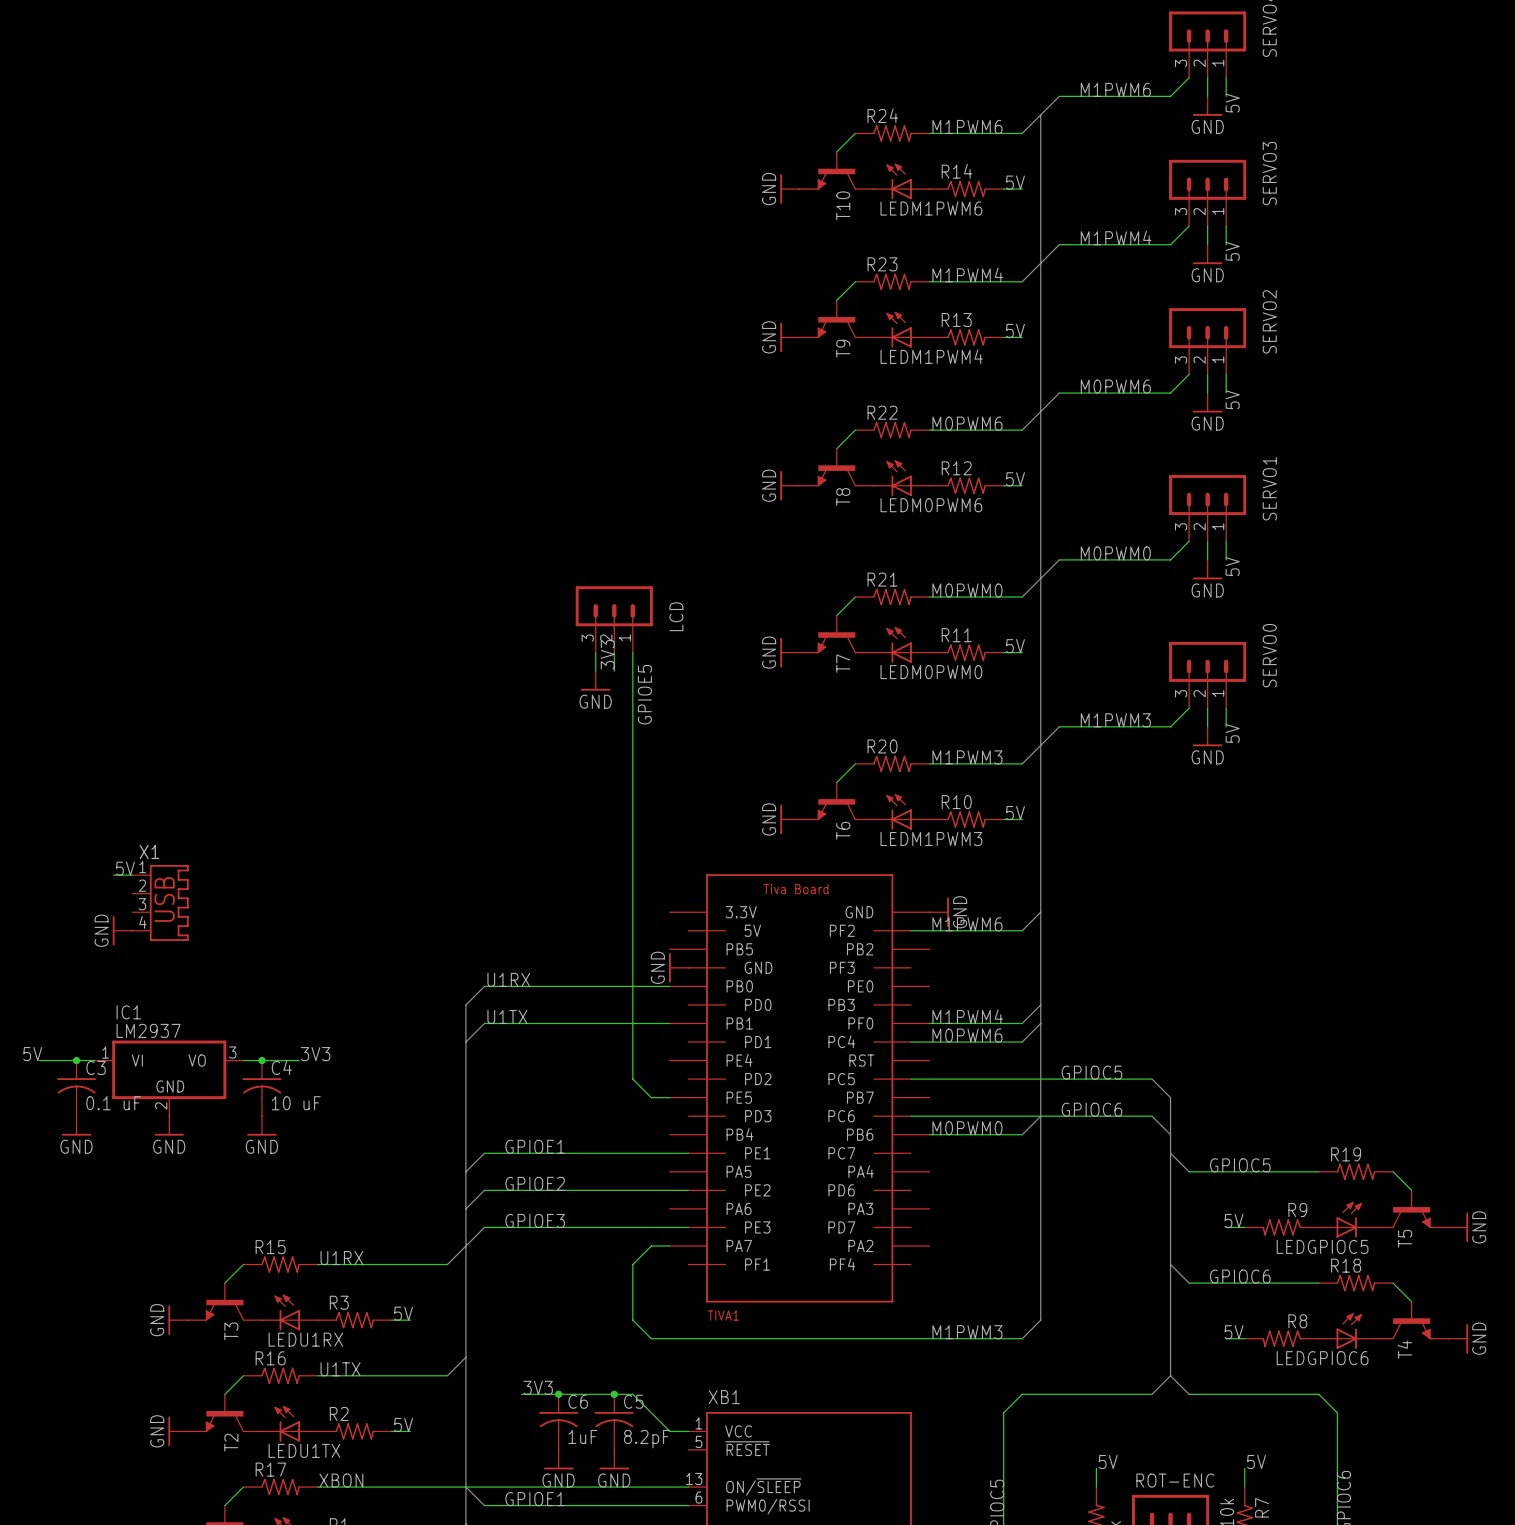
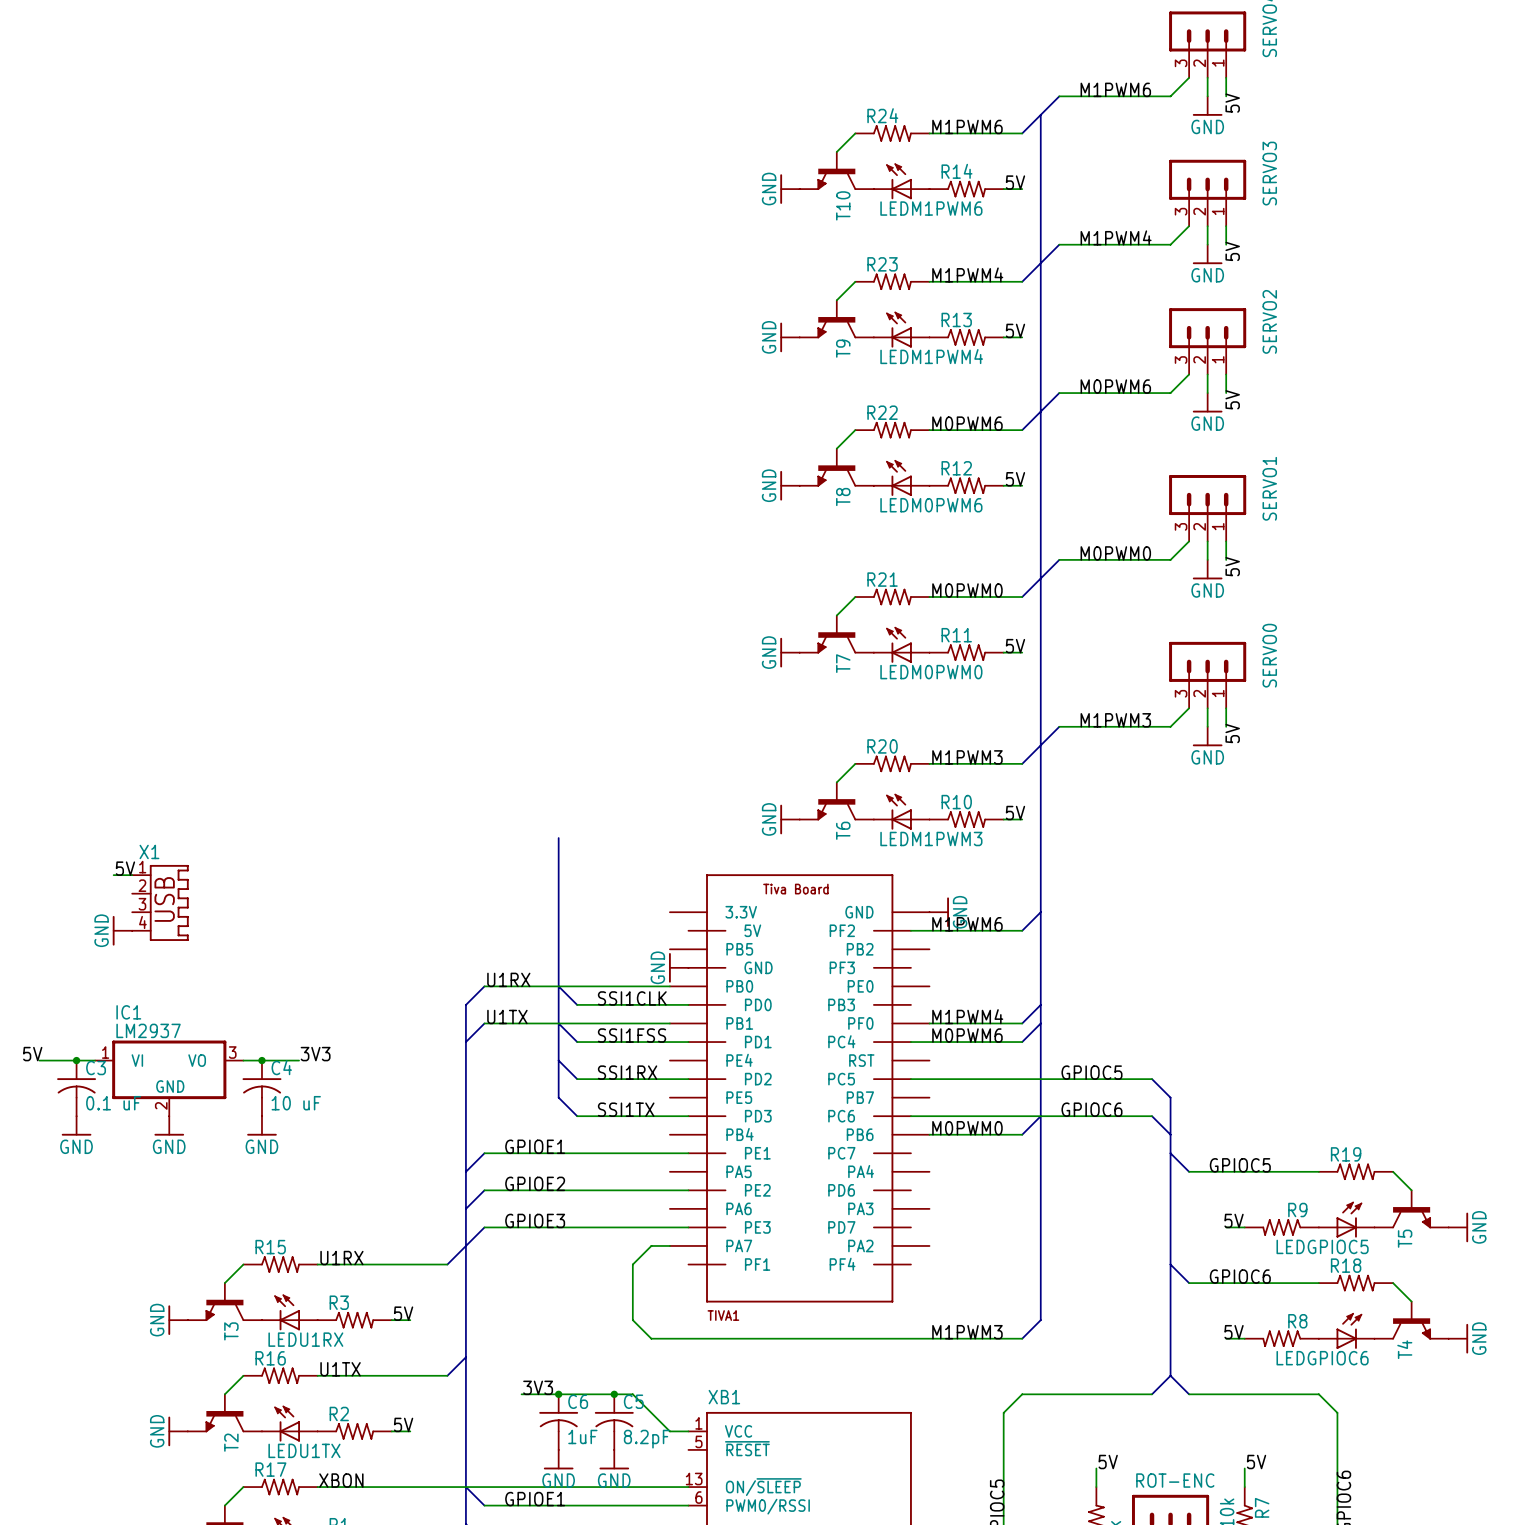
LCD: (614, 619) -> none
wire: (595, 652) (595, 671) -> none
wire: (614, 652) (614, 671) -> none
wire: (632, 652) (632, 1079) (651, 1097) (669, 1097) -> none
label: 3V3 (607, 654) -> none
power symbol: GND (595, 680) -> none
label: GPIOE5 (644, 694) -> none
bus: none -> (558, 838) (558, 1097) (577, 1116)
bus: none -> (558, 986) (577, 1004)
label: none -> SSI1CLK (632, 998)
wire: none -> (577, 1004) (688, 1004)
bus: none -> (558, 1023) (577, 1042)
label: none -> SSI1FSS (632, 1035)
wire: none -> (577, 1042) (688, 1042)
bus: none -> (558, 1060) (577, 1079)
label: none -> SSI1RX (627, 1072)
wire: none -> (577, 1079) (688, 1079)
label: none -> SSI1TX (626, 1109)
wire: none -> (577, 1116) (688, 1116)

